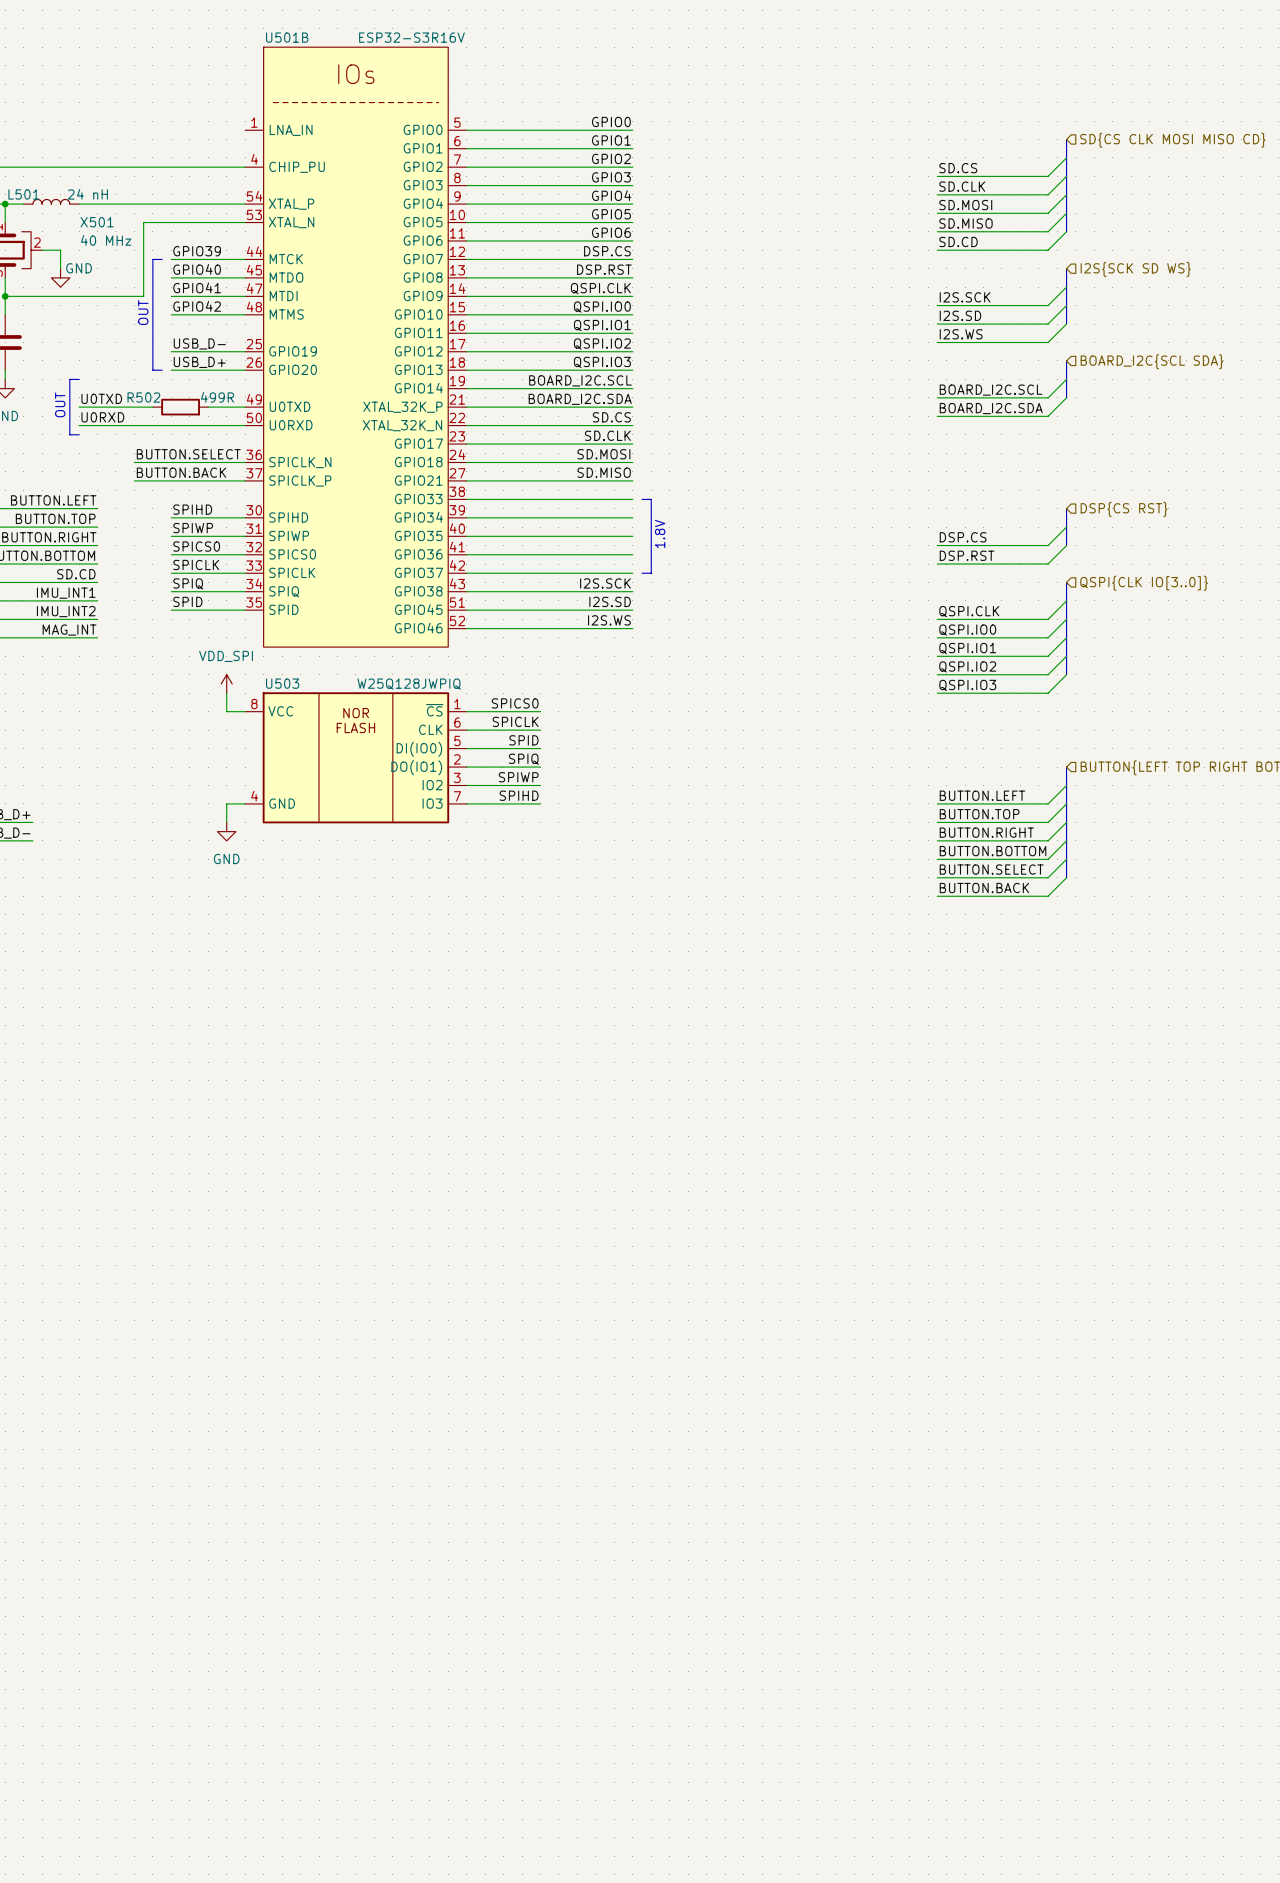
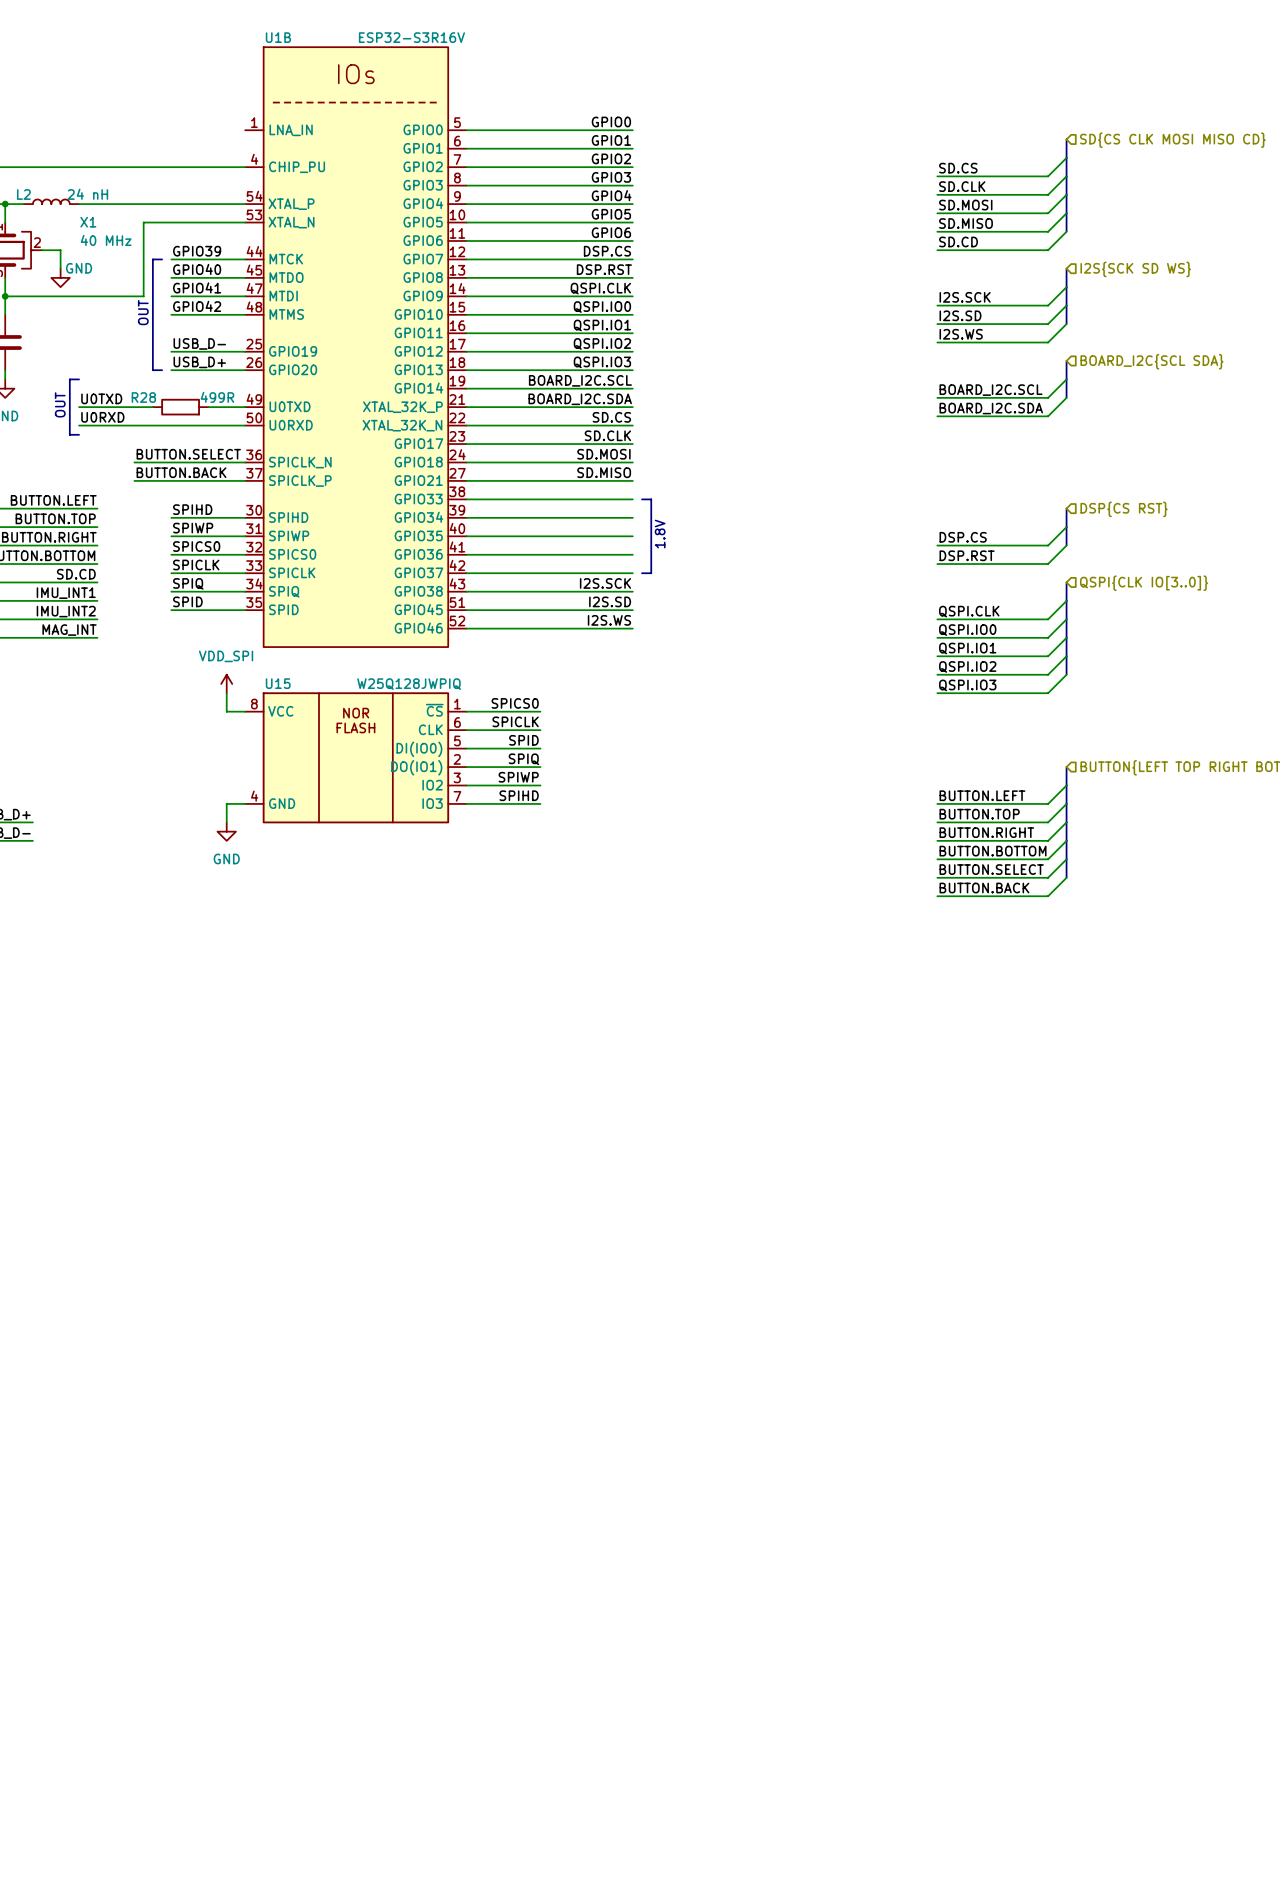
U501B name: U501B (287, 37) -> U1B (278, 37)
L501 name: L501 (23, 194) -> L2 (23, 194)
X501 name: X501 (97, 222) -> X1 (88, 222)
R502 name: R502 (143, 397) -> R28 (143, 397)
U503 name: U503 (282, 683) -> U15 (278, 683)

